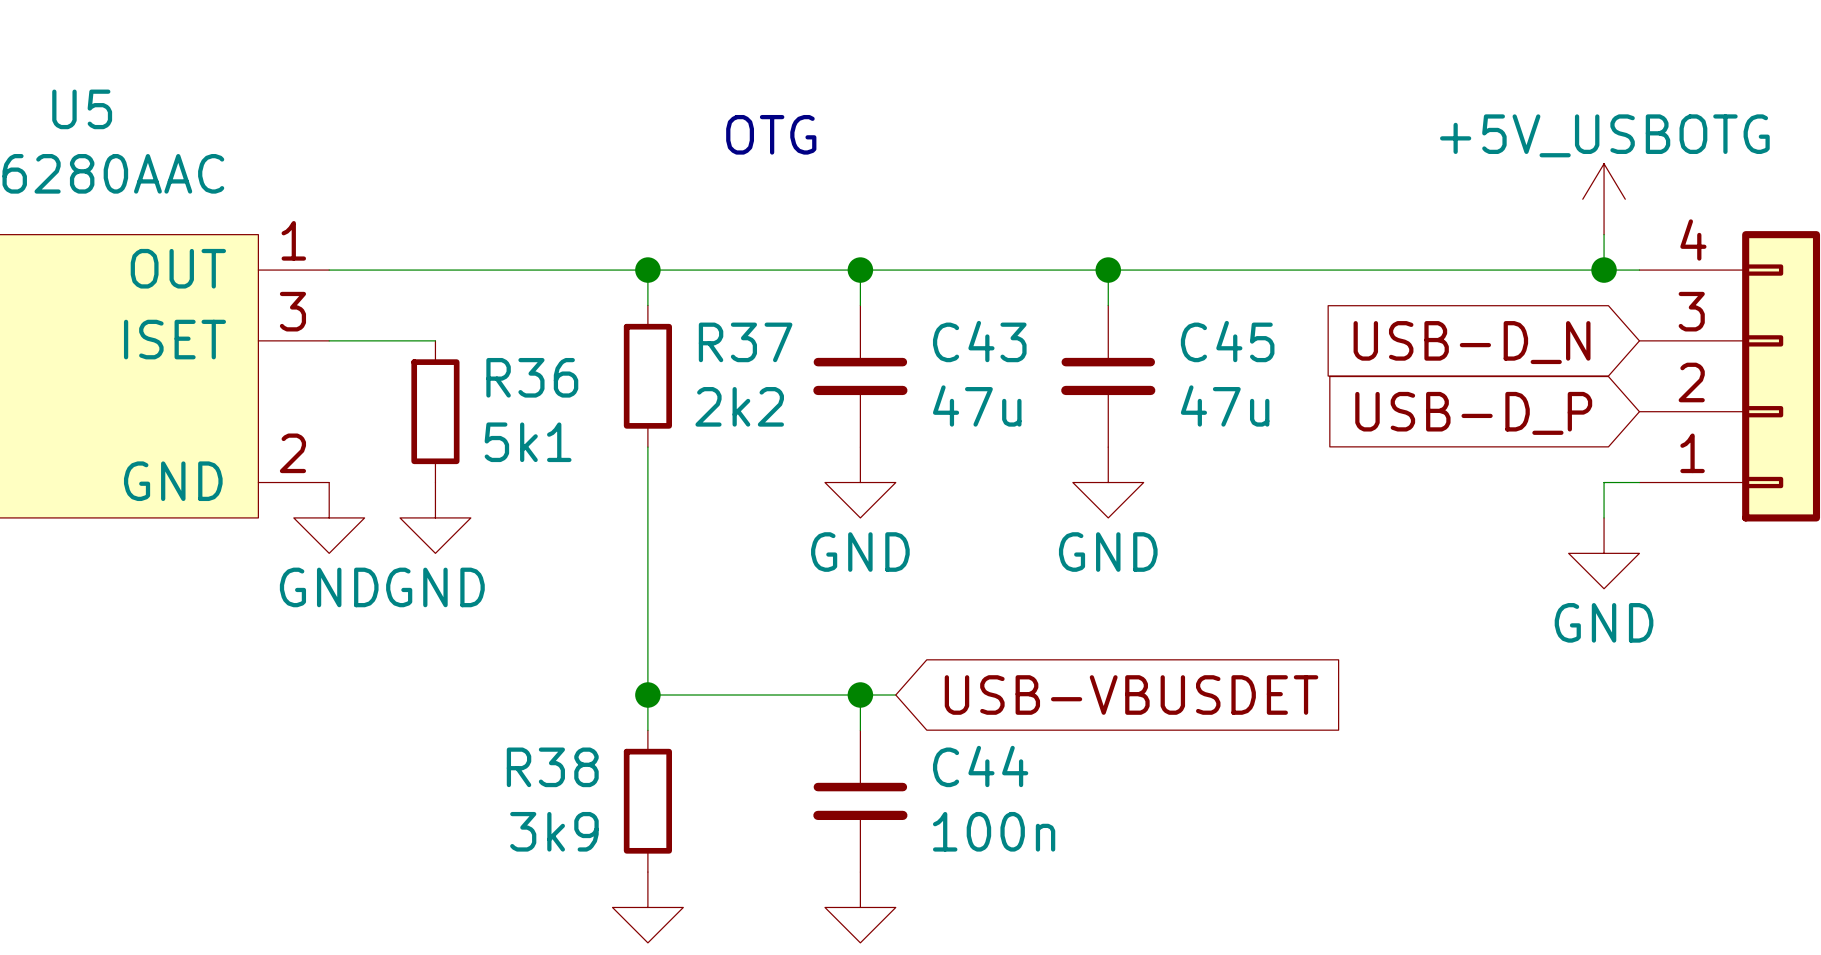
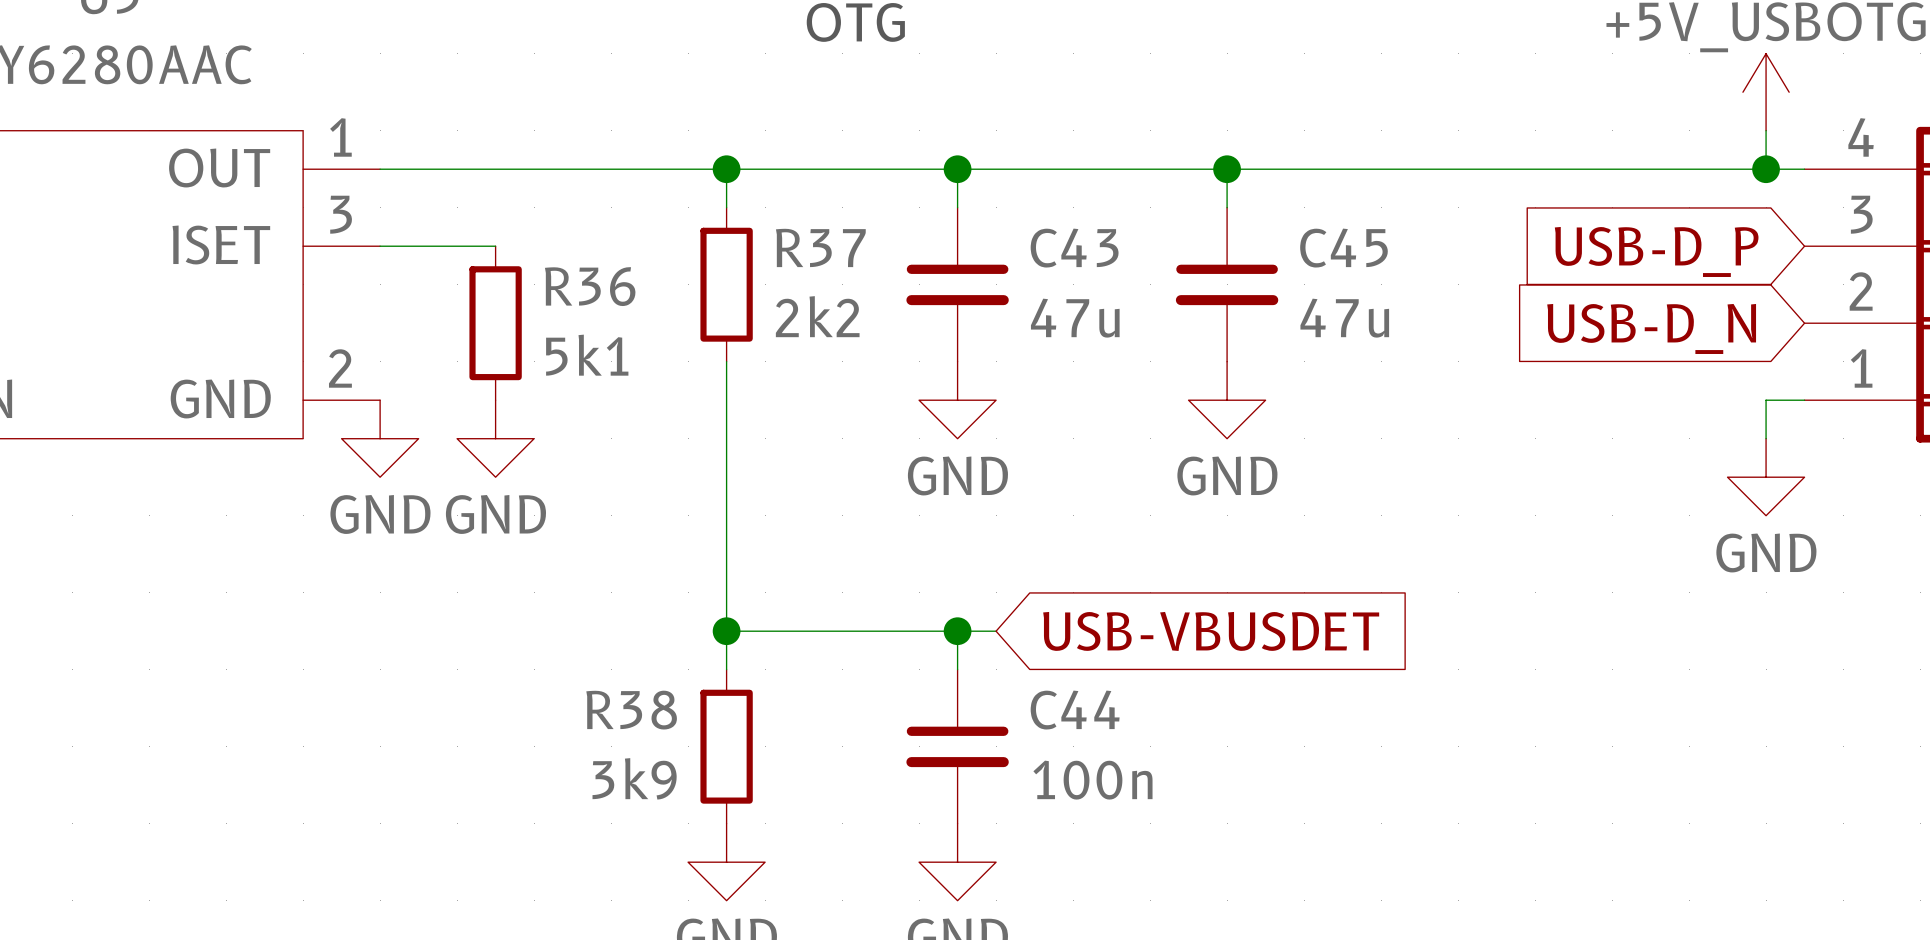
global label: USB-D_N (1472, 342) -> USB-D_P (1656, 251)
global label: USB-D_P (1473, 413) -> USB-D_N (1651, 328)

